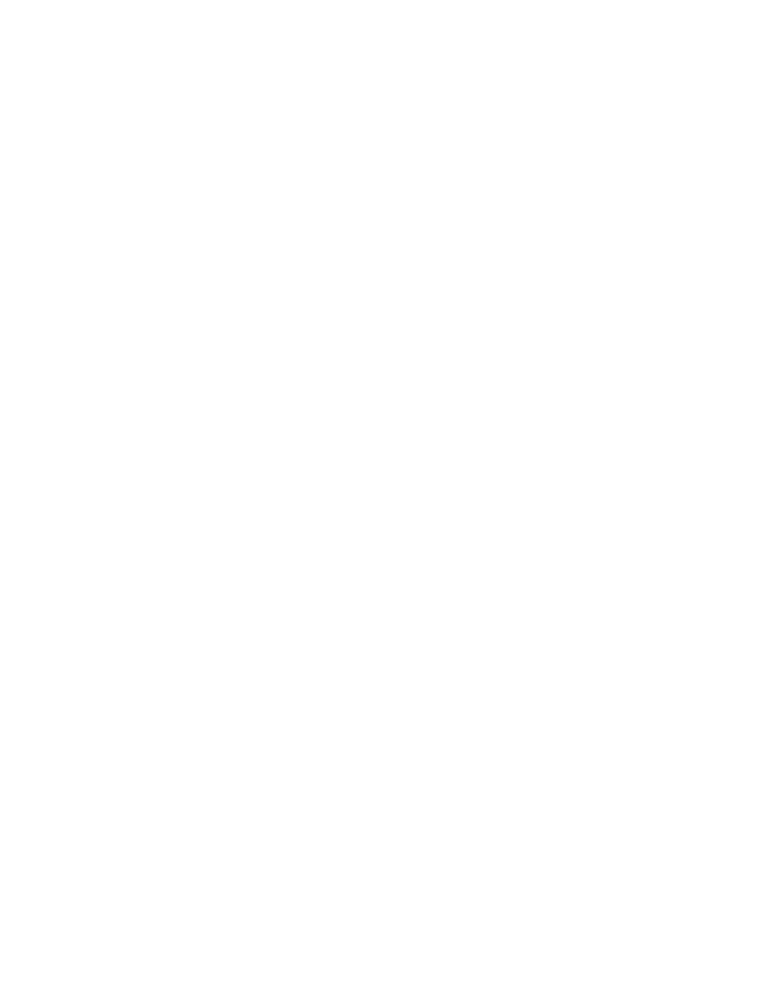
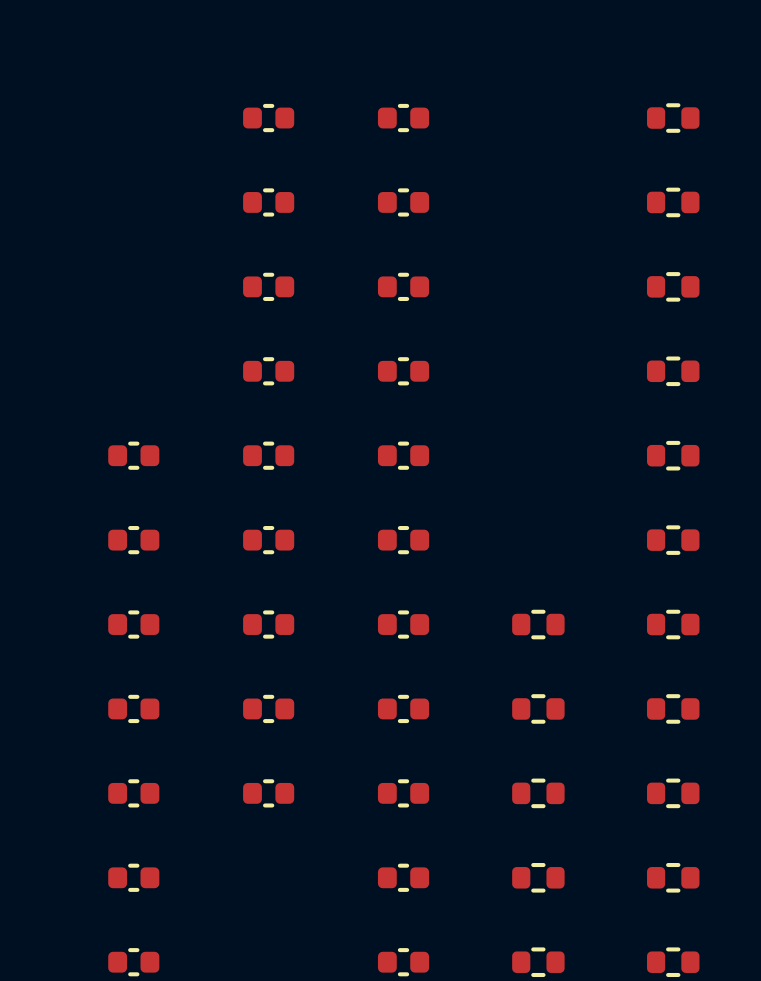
part: none -> (268, 118)
part: none -> (403, 118)
part: none -> (673, 118)
part: none -> (268, 202)
part: none -> (403, 202)
part: none -> (673, 202)
part: none -> (268, 286)
part: none -> (403, 286)
part: none -> (673, 286)
part: none -> (268, 371)
part: none -> (403, 371)
part: none -> (673, 371)
part: none -> (133, 455)
part: none -> (268, 455)
part: none -> (403, 455)
part: none -> (673, 455)
part: none -> (133, 540)
part: none -> (268, 540)
part: none -> (403, 540)
part: none -> (673, 540)
part: none -> (133, 624)
part: none -> (268, 624)
part: none -> (403, 624)
part: none -> (538, 624)
part: none -> (673, 624)
part: none -> (133, 708)
part: none -> (268, 708)
part: none -> (403, 708)
part: none -> (538, 708)
part: none -> (673, 708)
part: none -> (133, 793)
part: none -> (268, 793)
part: none -> (403, 793)
part: none -> (538, 793)
part: none -> (673, 793)
part: none -> (133, 877)
part: none -> (403, 877)
part: none -> (538, 877)
part: none -> (673, 877)
part: none -> (133, 962)
part: none -> (403, 962)
part: none -> (538, 962)
part: none -> (673, 962)

